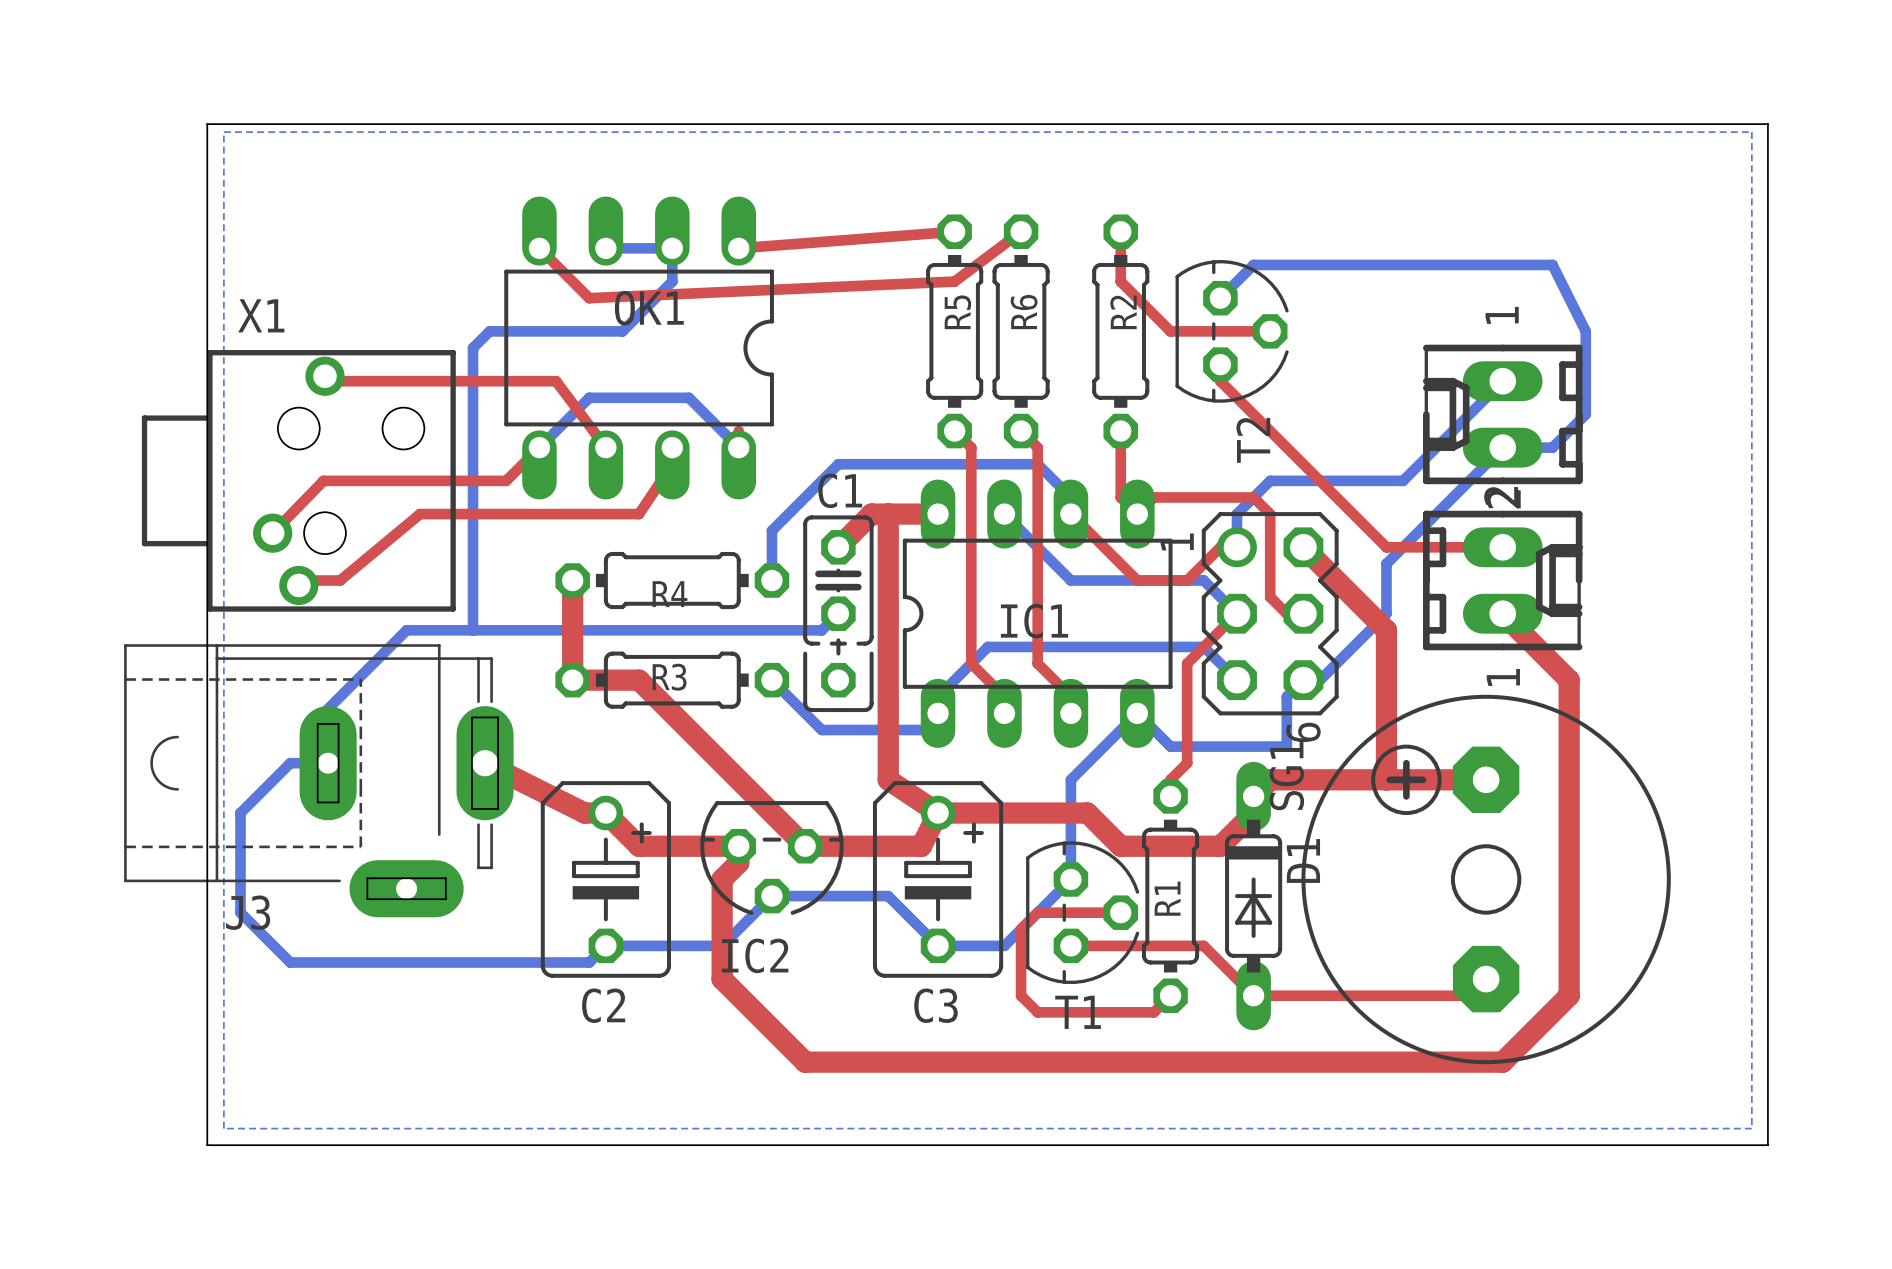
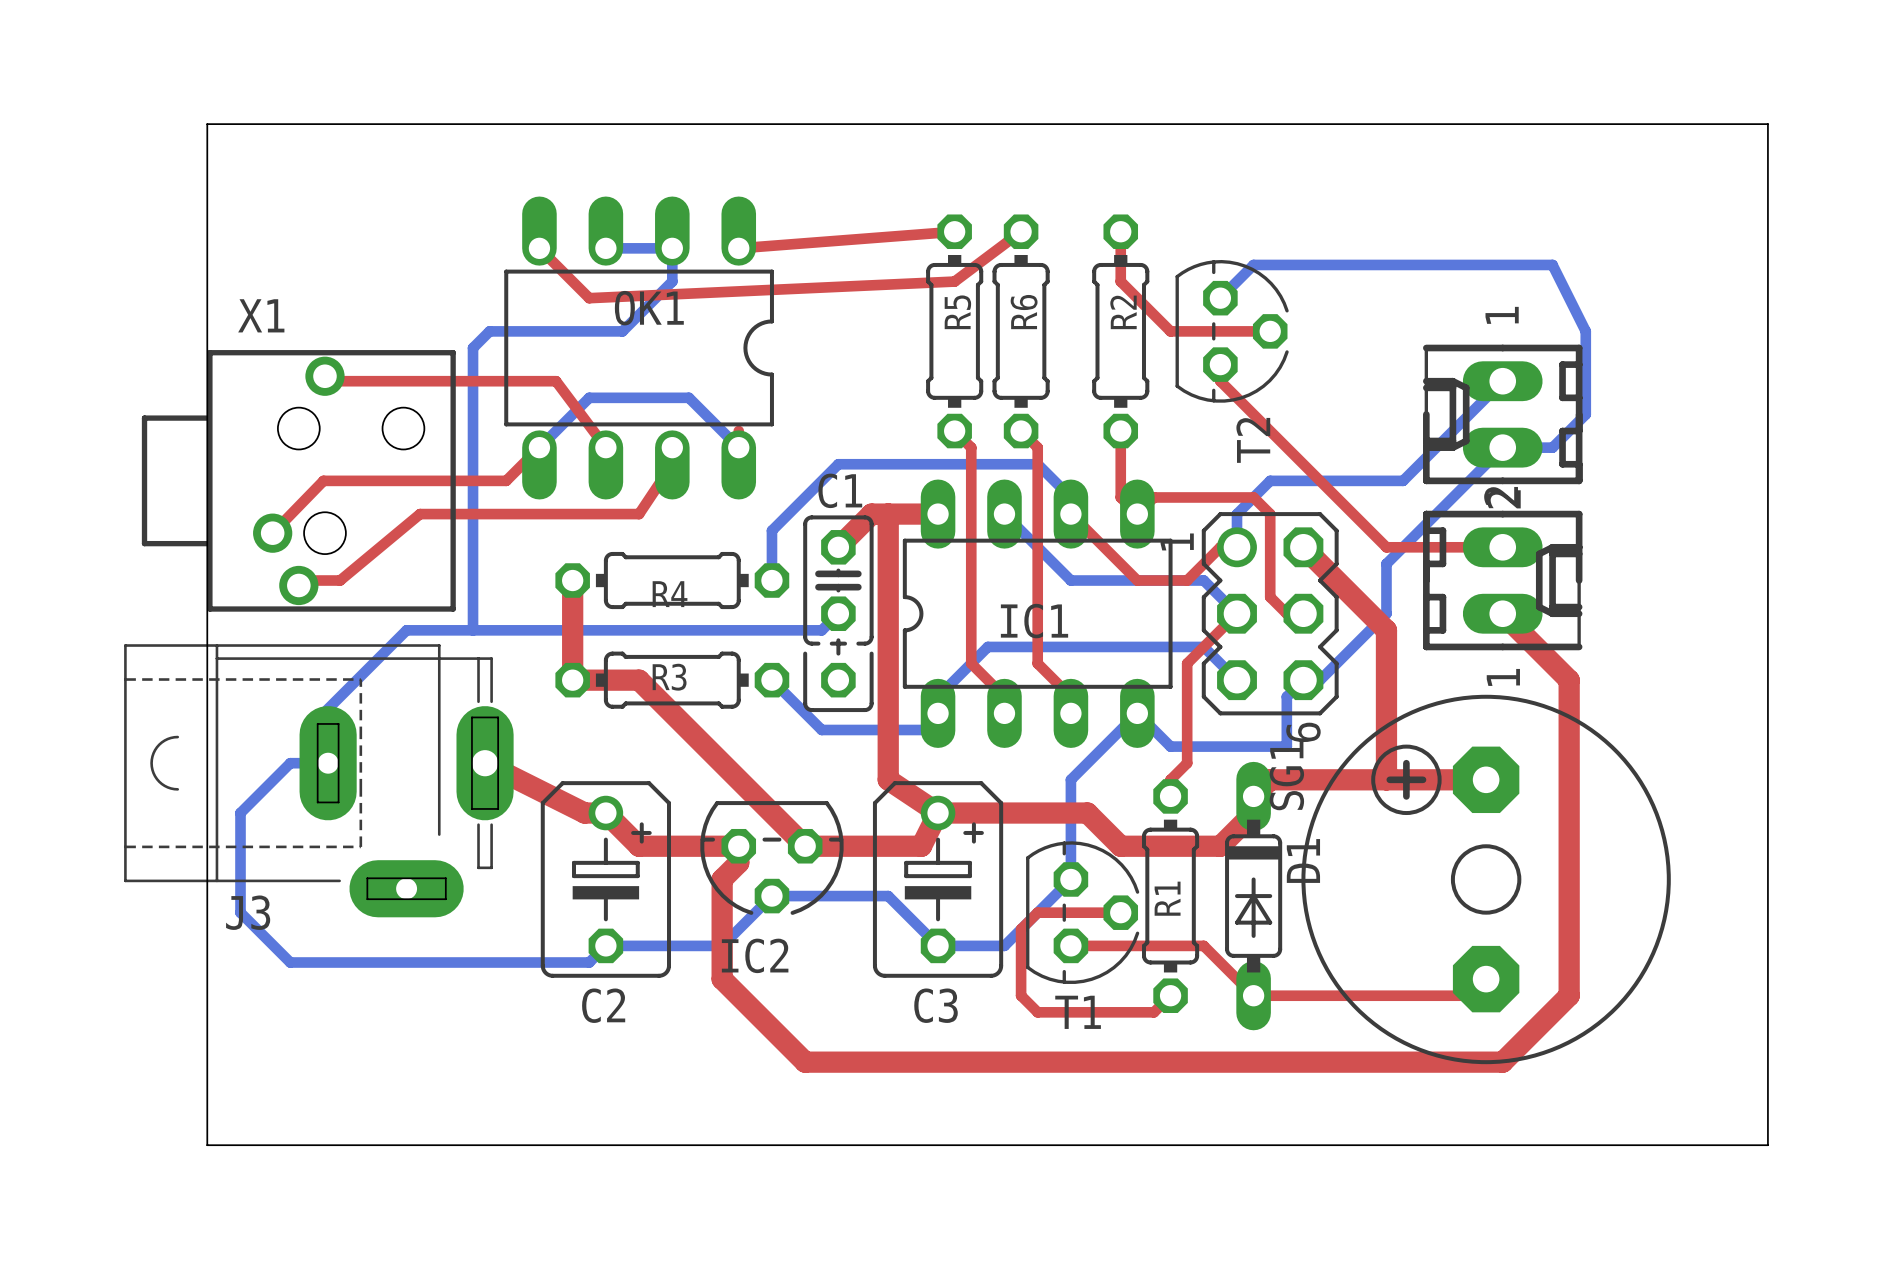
bottom zone outline: (223, 132) (223, 1128) (1751, 1128) (1751, 132) (223, 132) -> none

